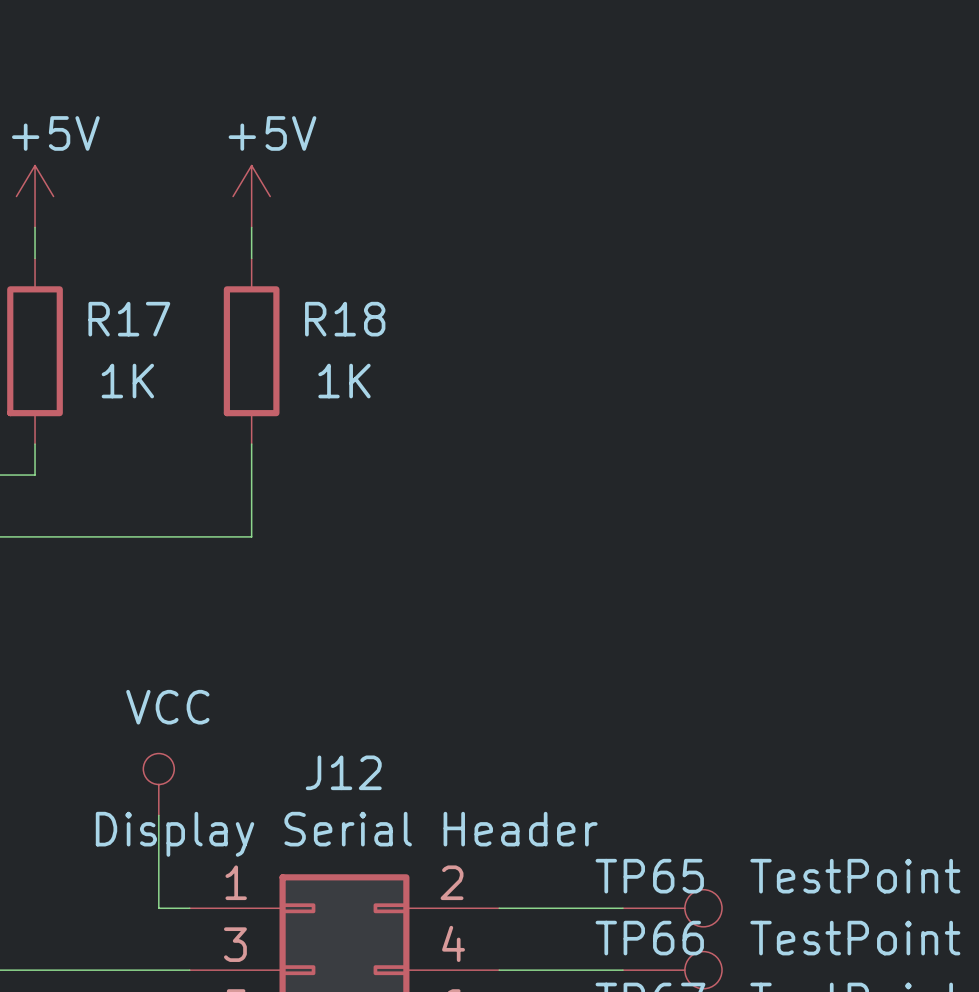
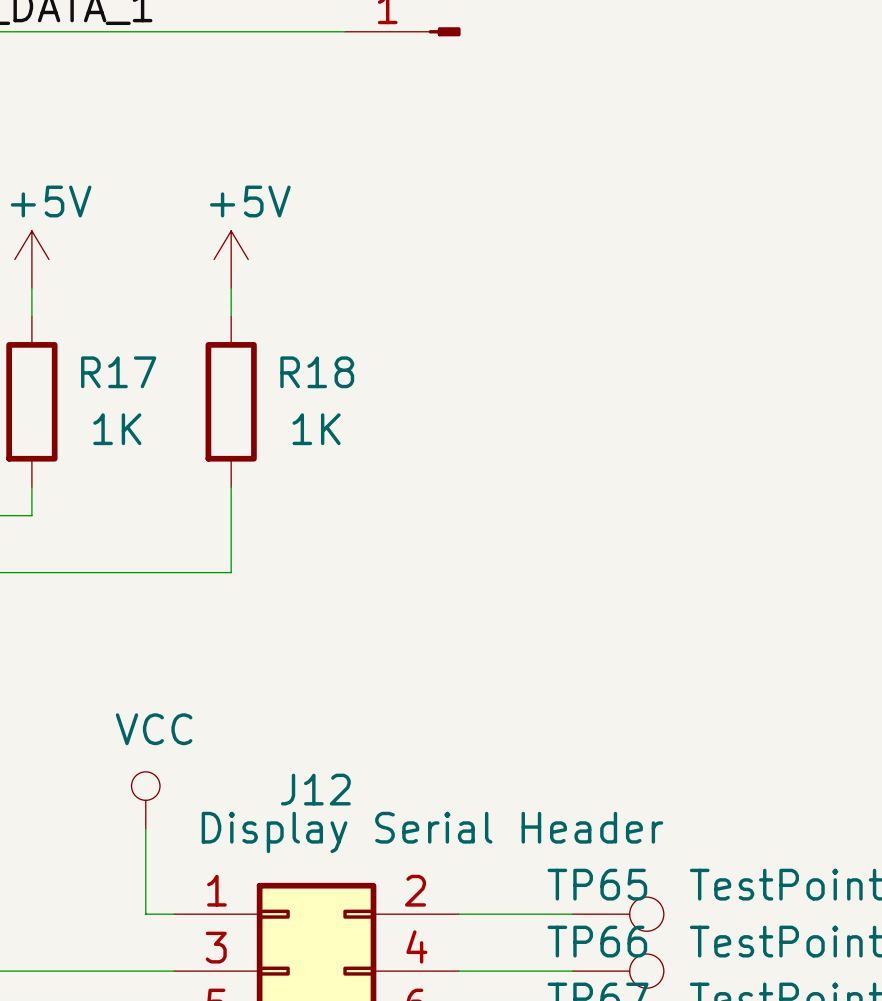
J12 value position: Display Serial Header (346, 834) -> Display Serial Header (432, 832)

